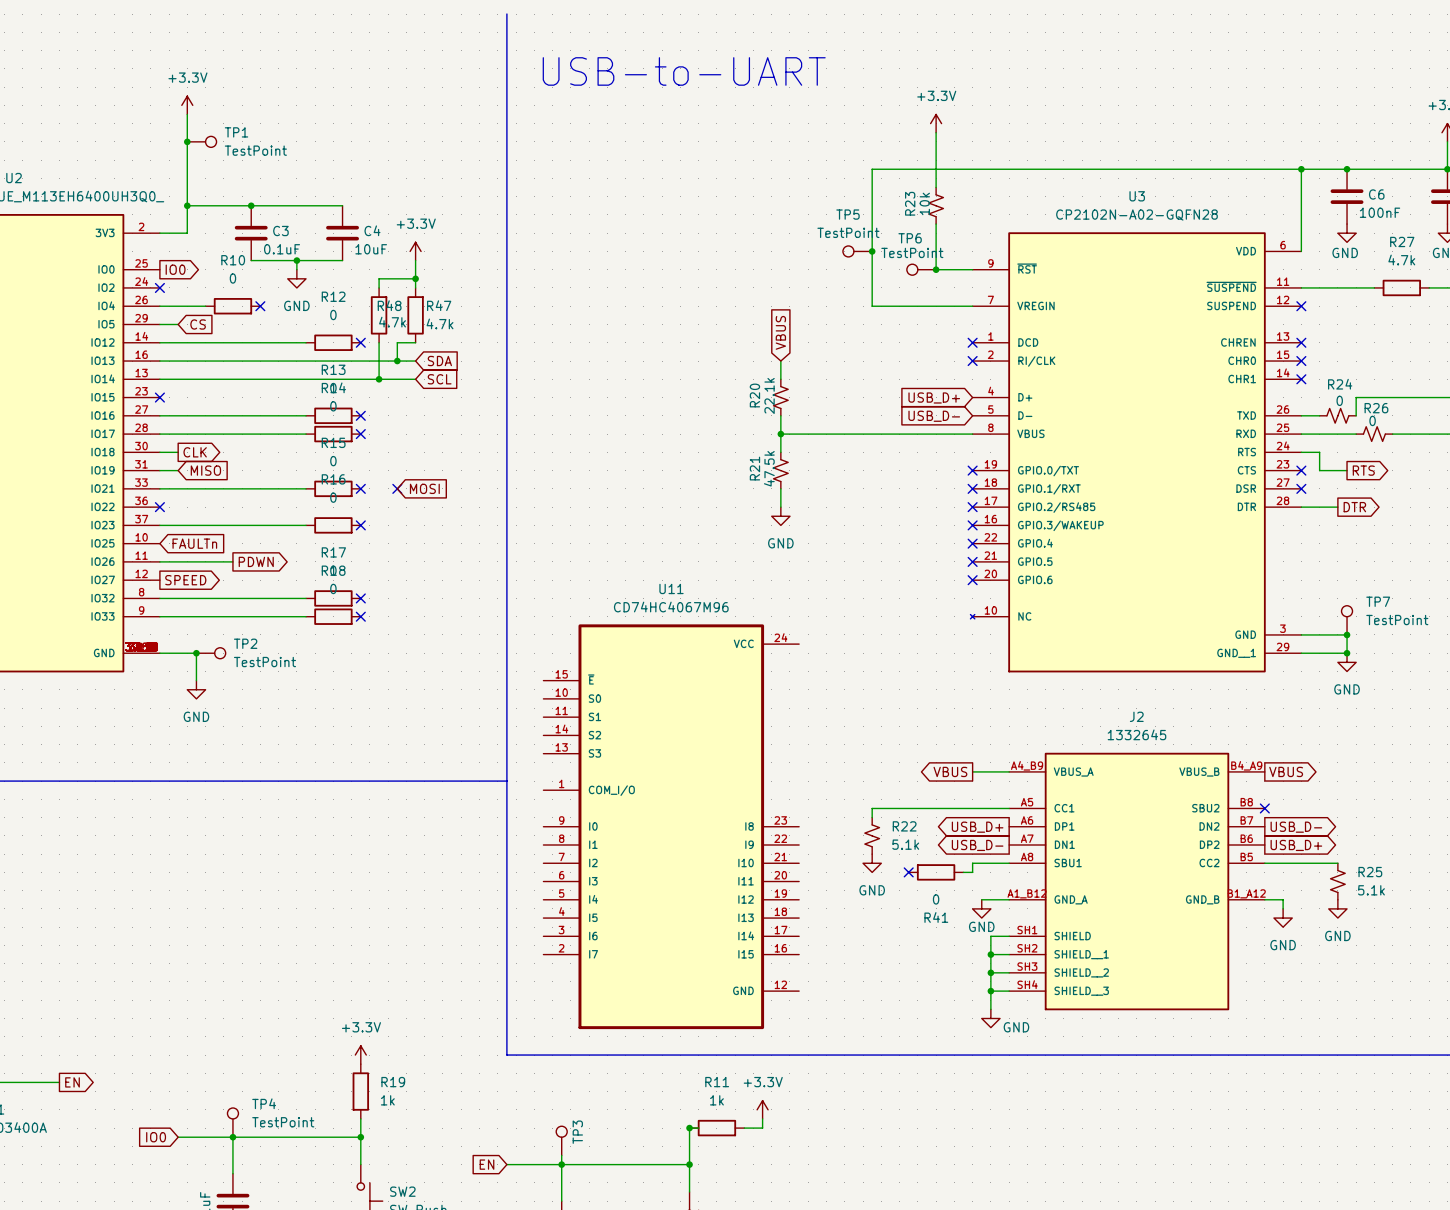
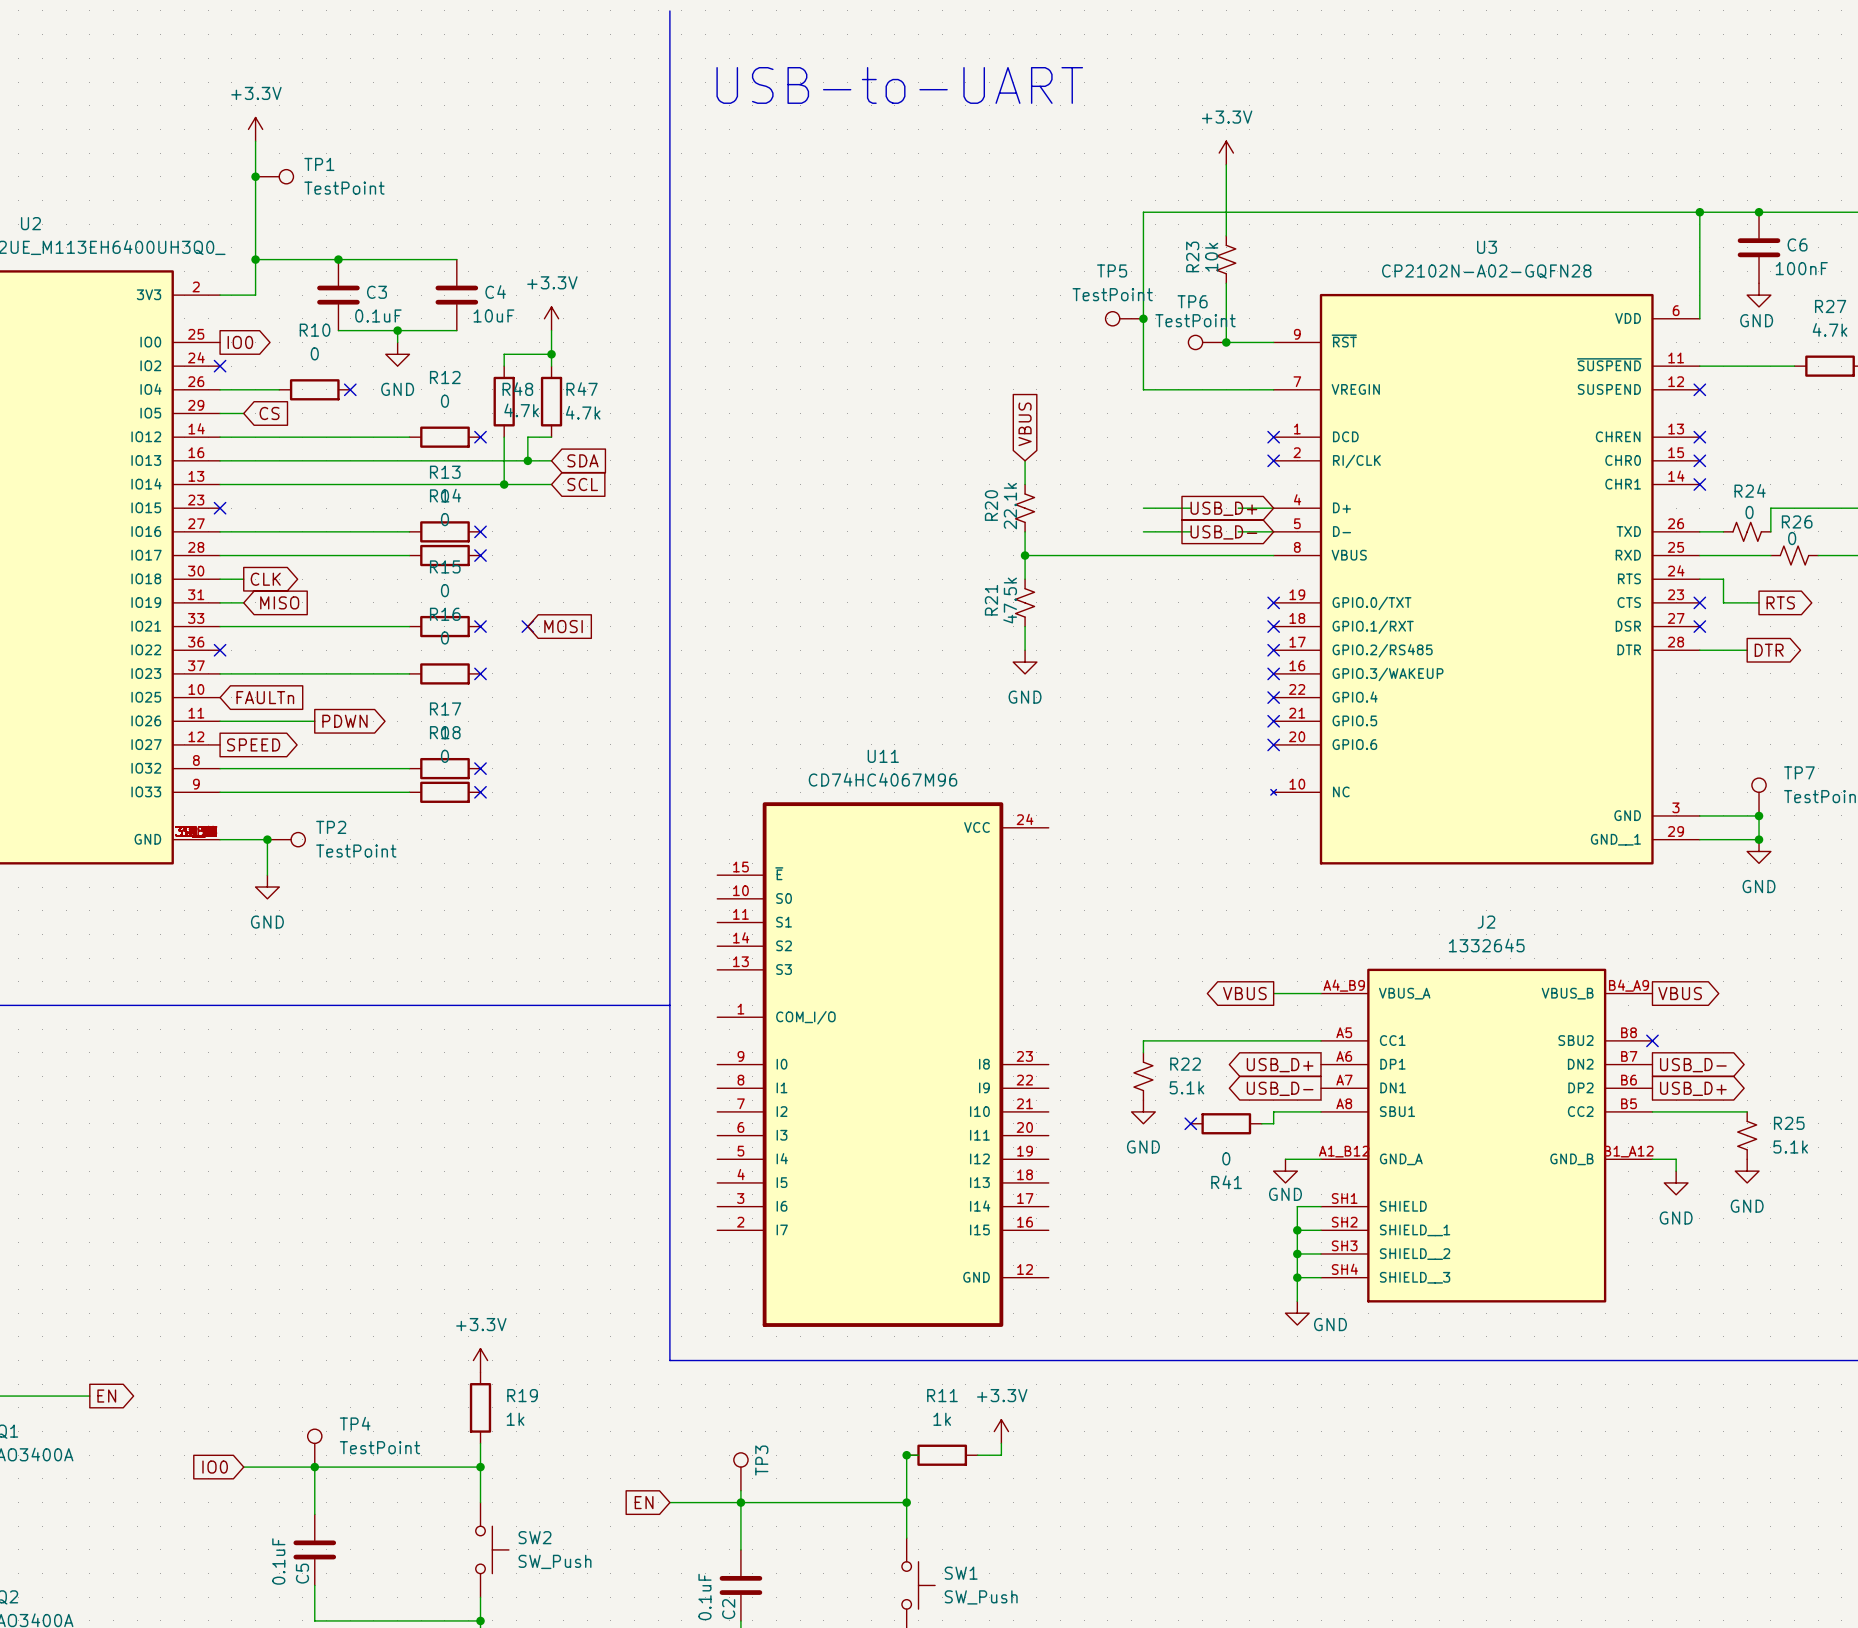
wire: none -> (1143, 508) (1190, 508)
wire: none -> (1238, 508) (1273, 508)
wire: none -> (1143, 531) (1190, 531)
wire: none -> (1238, 531) (1273, 531)

